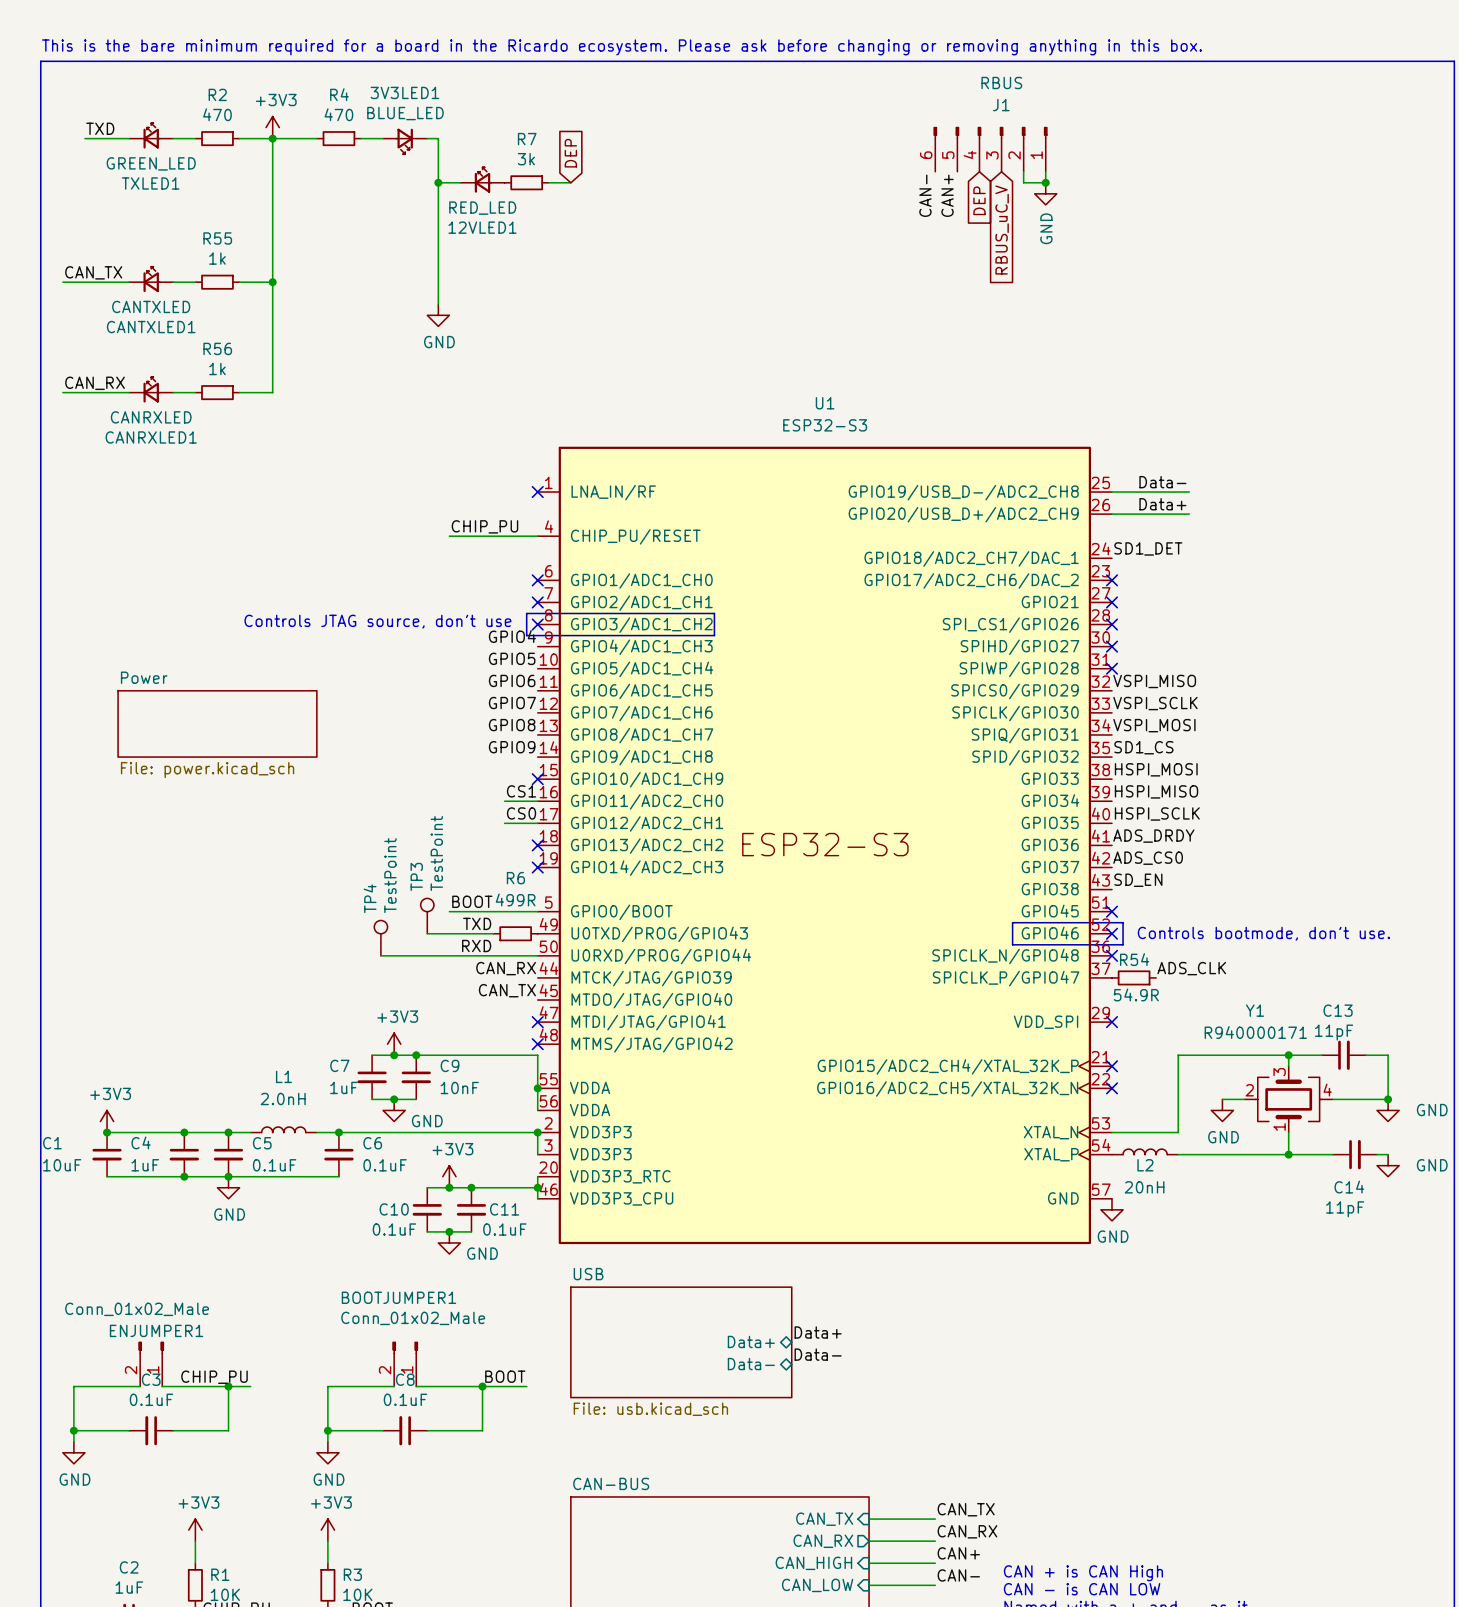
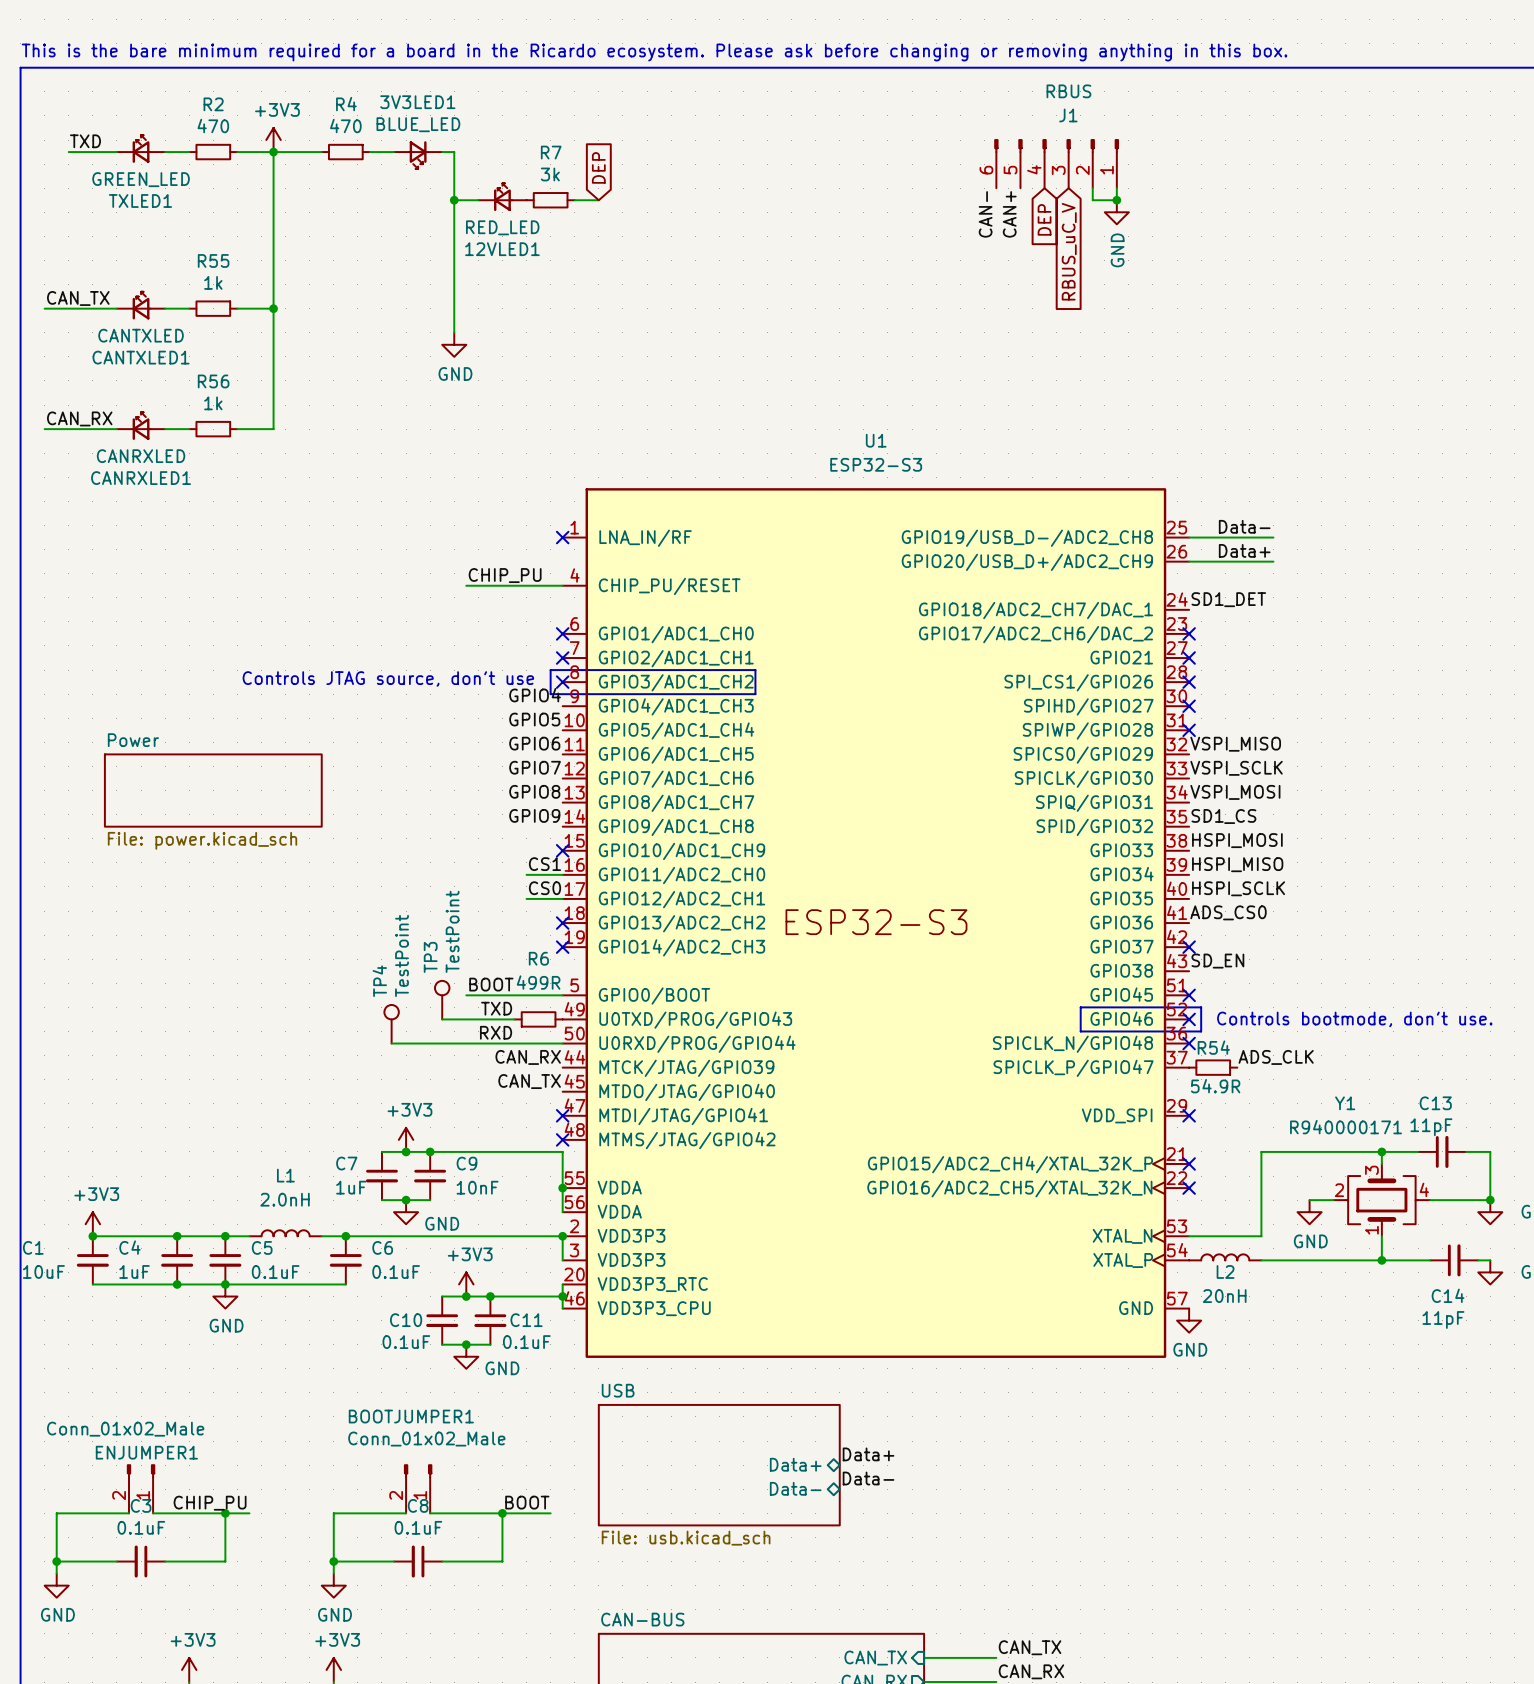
label: ADS_DRDY (1153, 836) -> ADS_CS0 (1228, 912)
label: ADS_CS0 (1148, 858) -> none
no-connect mark: none -> (1189, 947)

